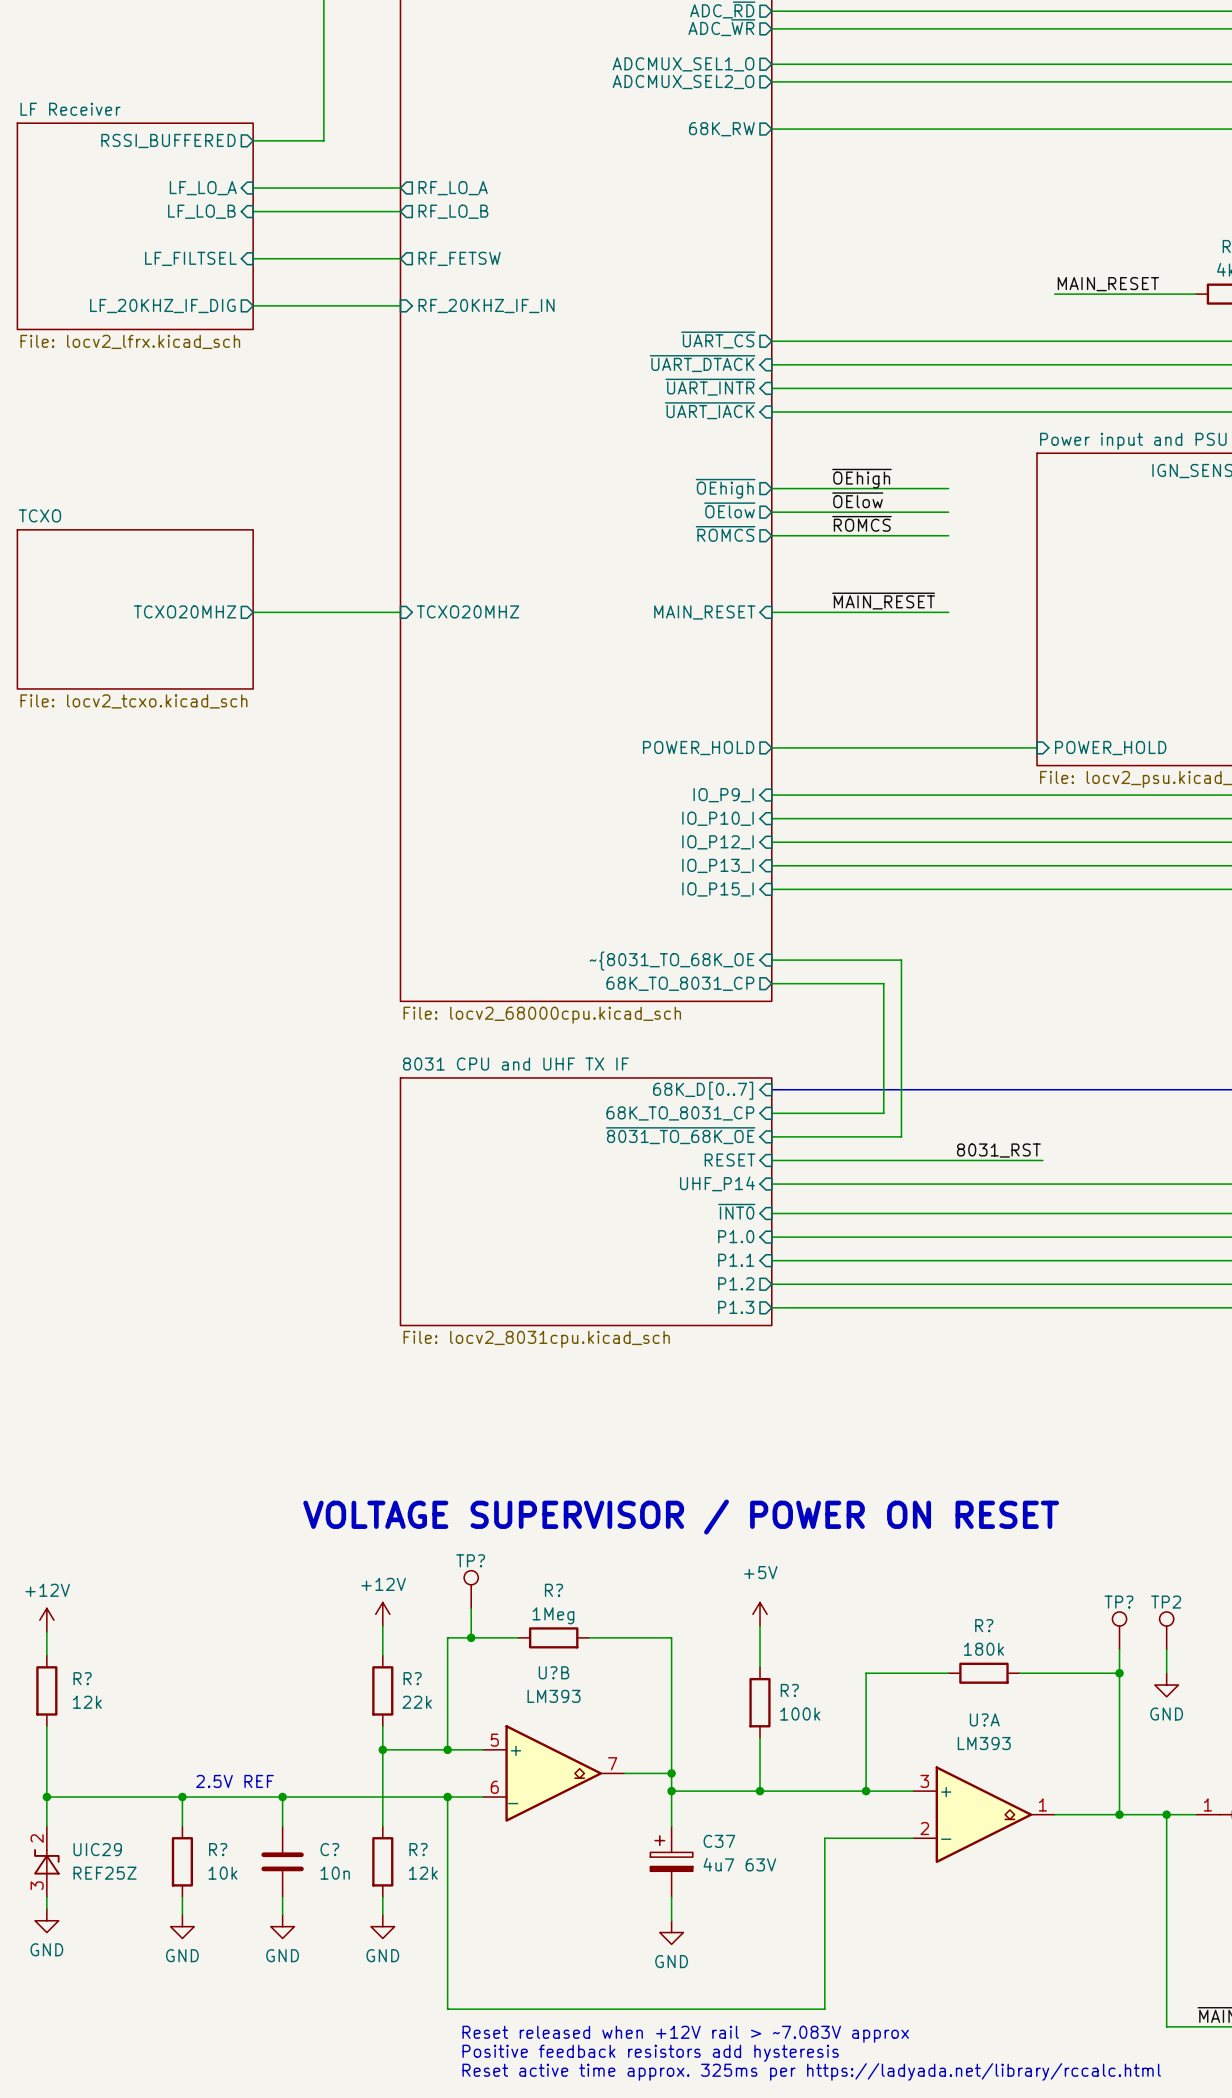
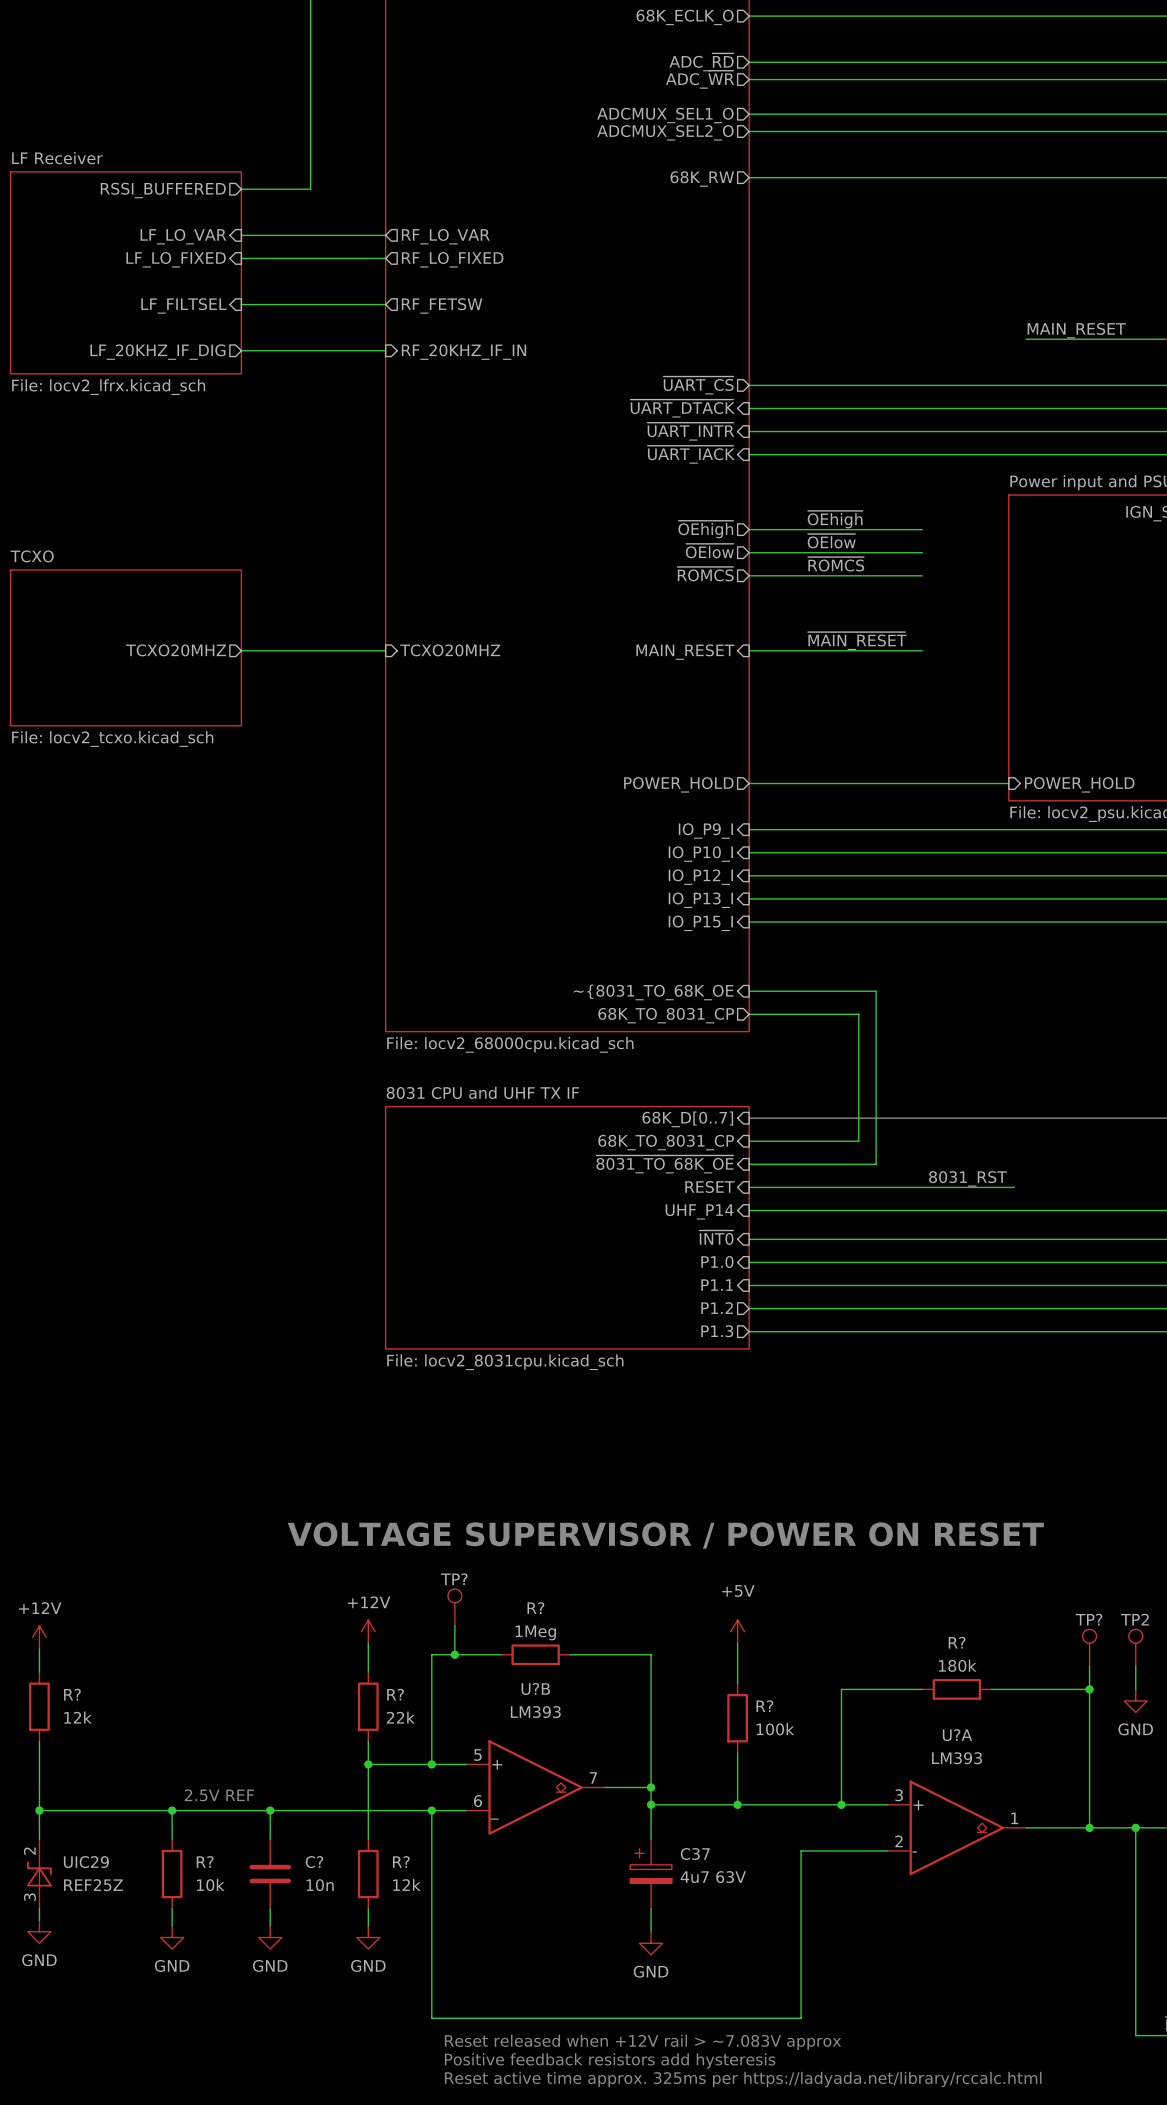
sheet pin: LF_LO_A (203, 188) -> LF_LO_VAR (183, 236)
sheet pin: RF_LO_A (453, 188) -> RF_LO_VAR (445, 236)
sheet pin: LF_LO_B (201, 211) -> LF_LO_FIXED (176, 259)
sheet pin: RF_LO_B (453, 211) -> RF_LO_FIXED (452, 259)

